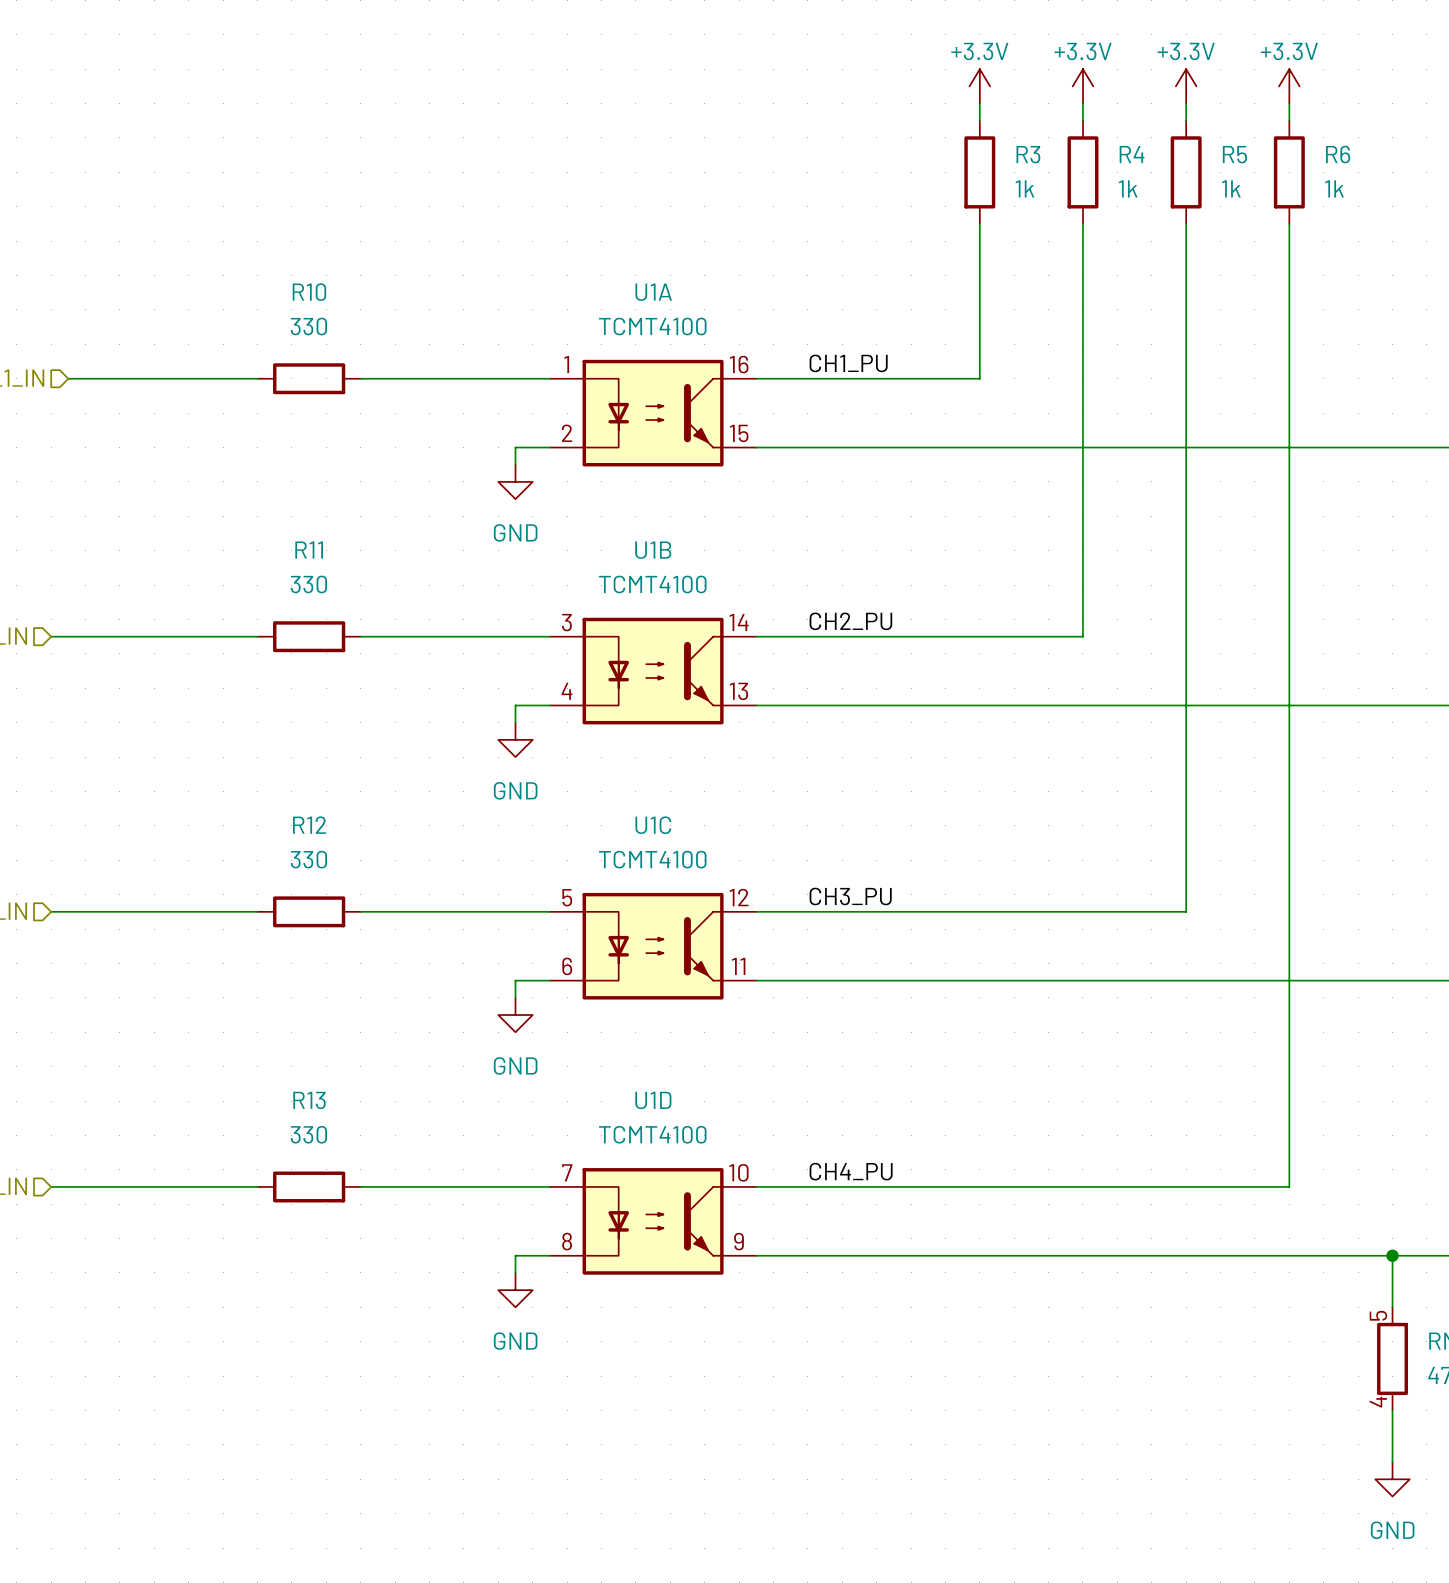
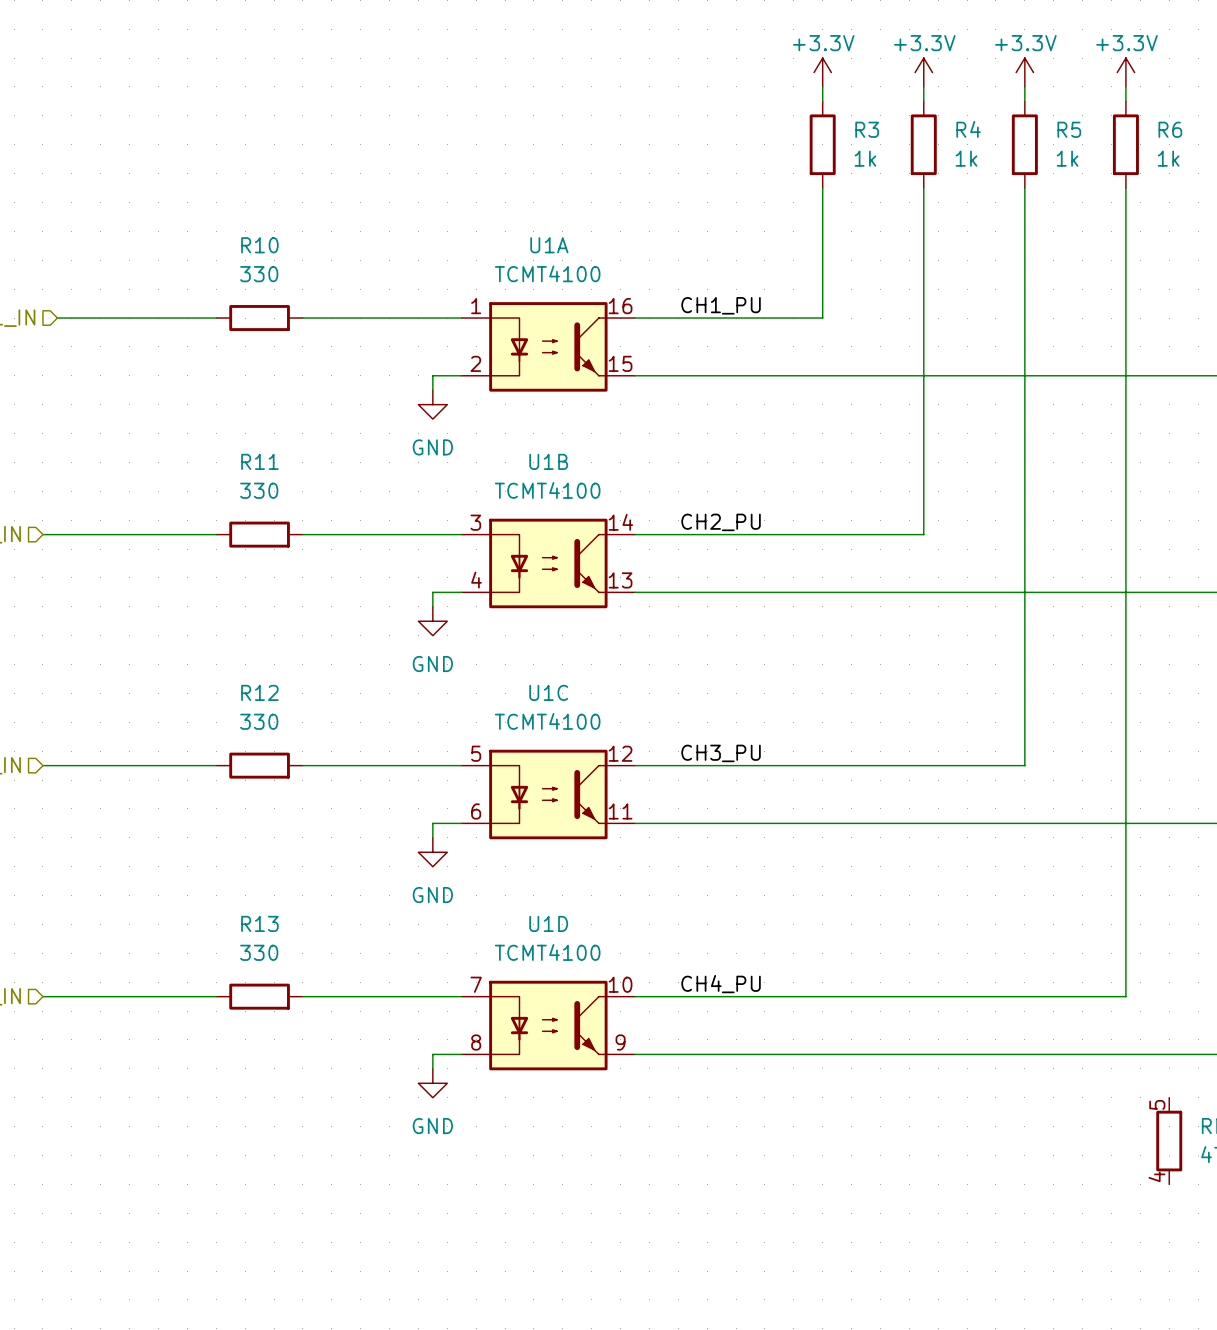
power symbol position: +3.3V (1082, 86) -> +3.3V (923, 72)
power symbol: +3.3V (1186, 86) -> none
power symbol: none -> +3.3V (1024, 72)
power symbol: +3.3V (1289, 86) -> none
power symbol: none -> +3.3V (1125, 72)
wire: (1082, 103) (1082, 120) -> (923, 86) (923, 101)
wire: (1186, 103) (1186, 120) -> (1024, 86) (1024, 101)
wire: (1289, 103) (1289, 120) -> (1125, 86) (1125, 101)
R4 position: (1082, 172) -> (923, 144)
R5 position: (1186, 172) -> (1024, 144)
R6 position: (1289, 172) -> (1125, 144)
wire: (1082, 223) (1082, 636) -> (923, 188) (923, 534) (909, 534)
wire: (1186, 223) (1186, 911) -> (1024, 188) (1024, 765) (995, 765)
wire: (1289, 223) (1289, 1186) -> (1125, 188) (1125, 996) (1082, 996)
wire: (1392, 1255) (1392, 1307) -> none
junction: (1392, 1255) -> none
wire: (1392, 1410) (1392, 1462) -> none
power symbol: GND (1392, 1479) -> none

